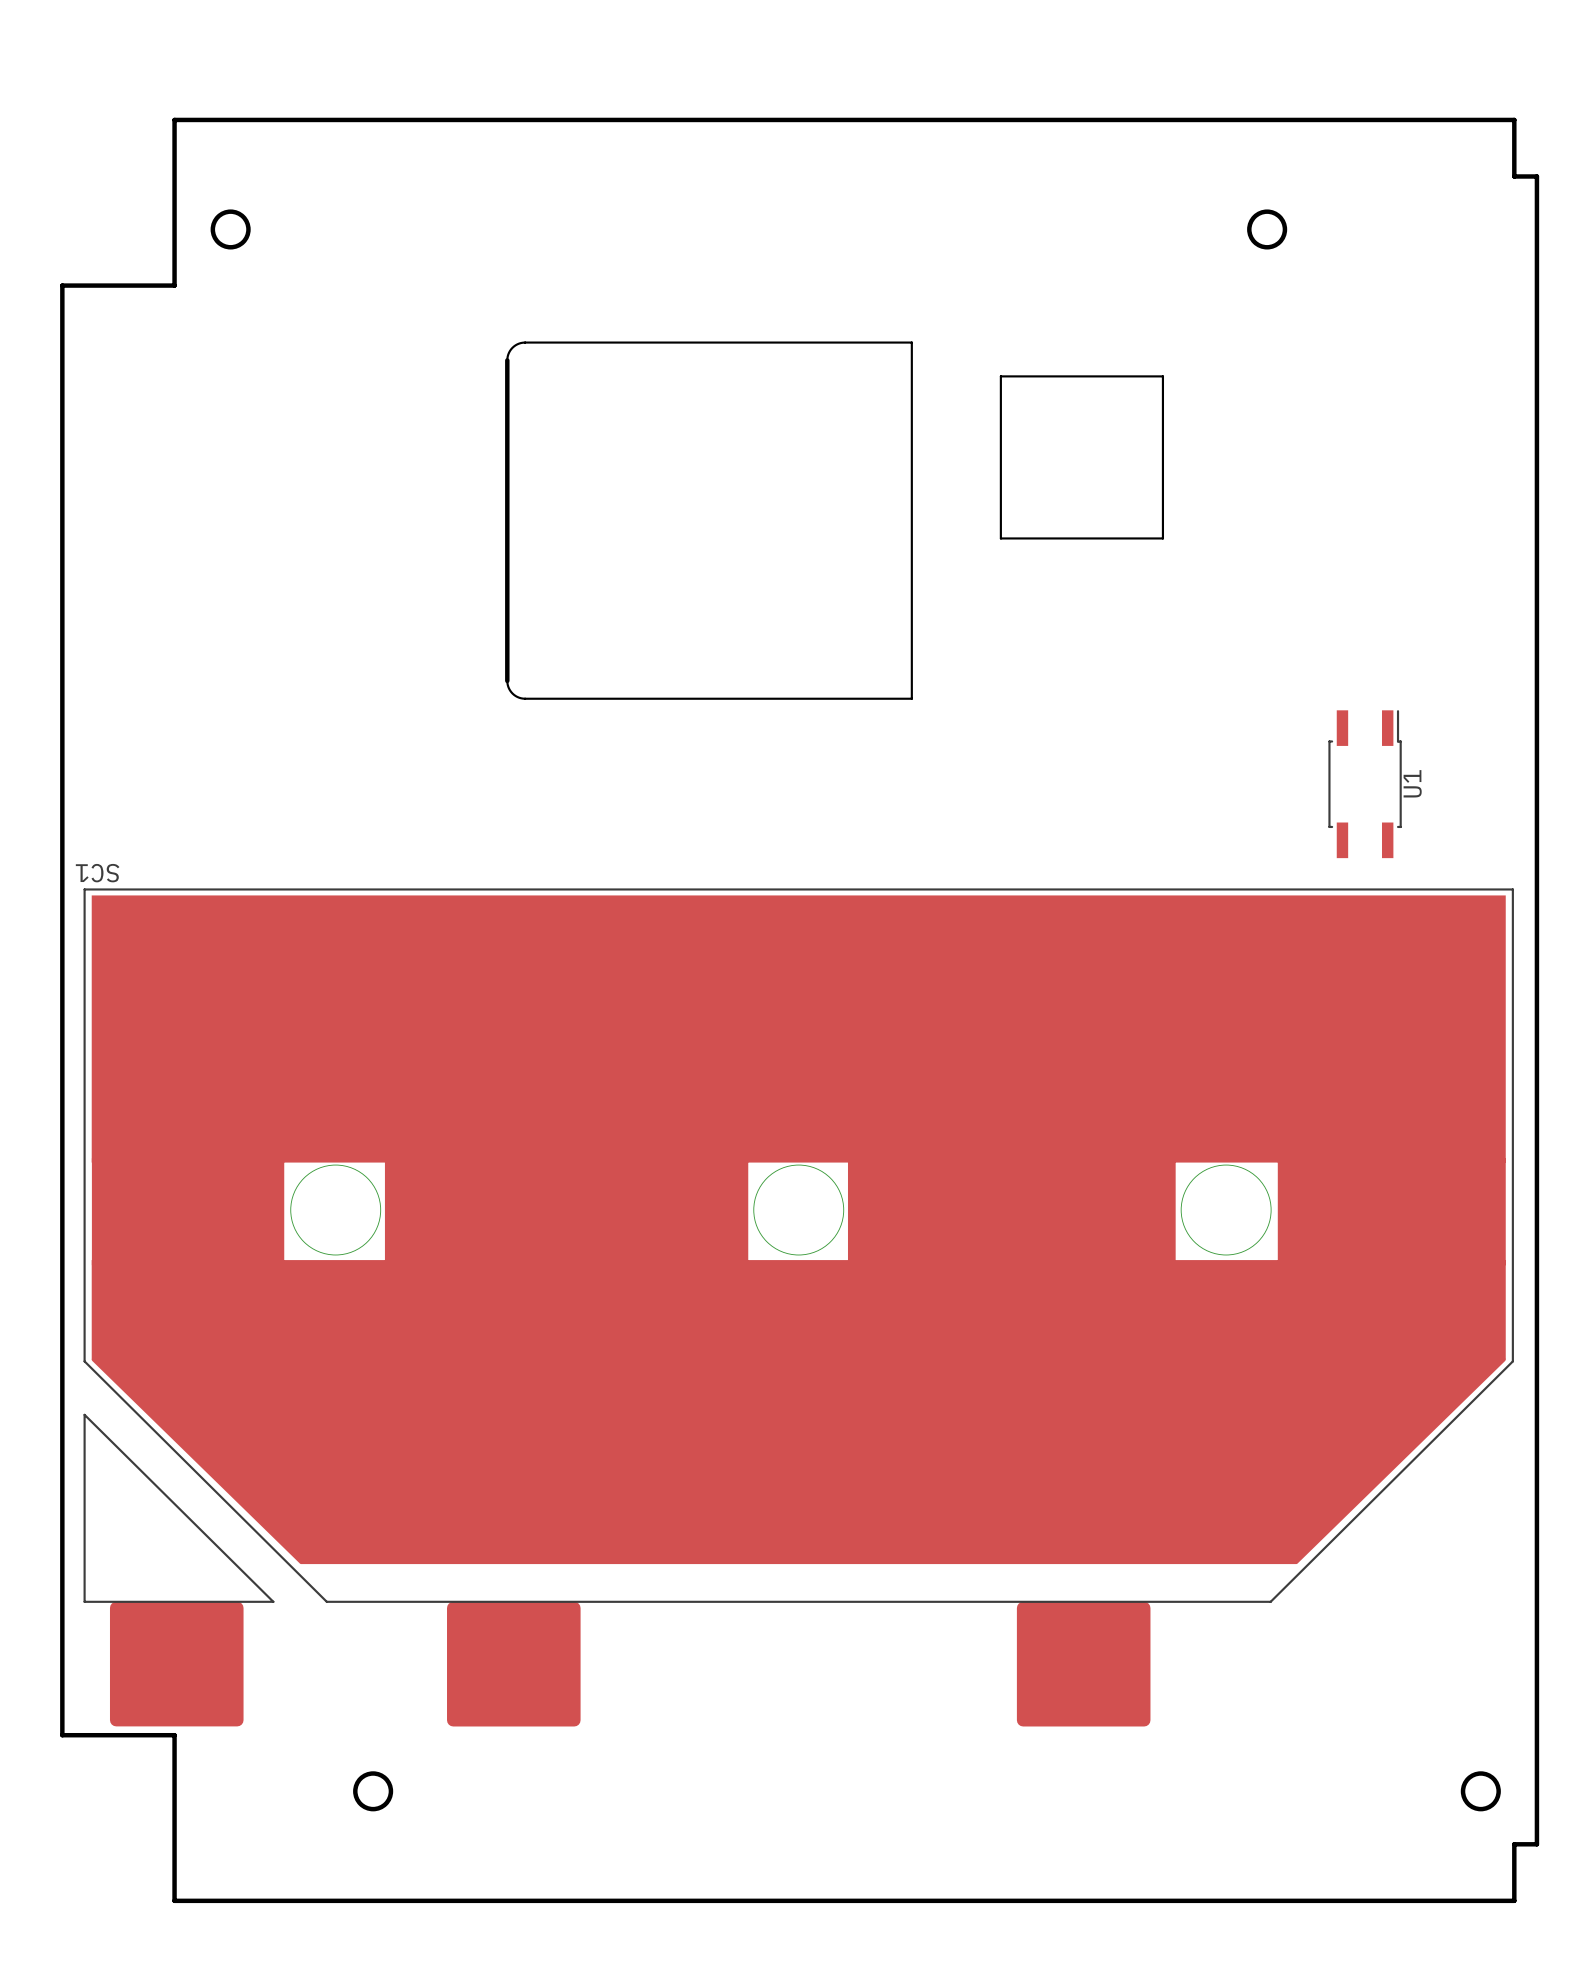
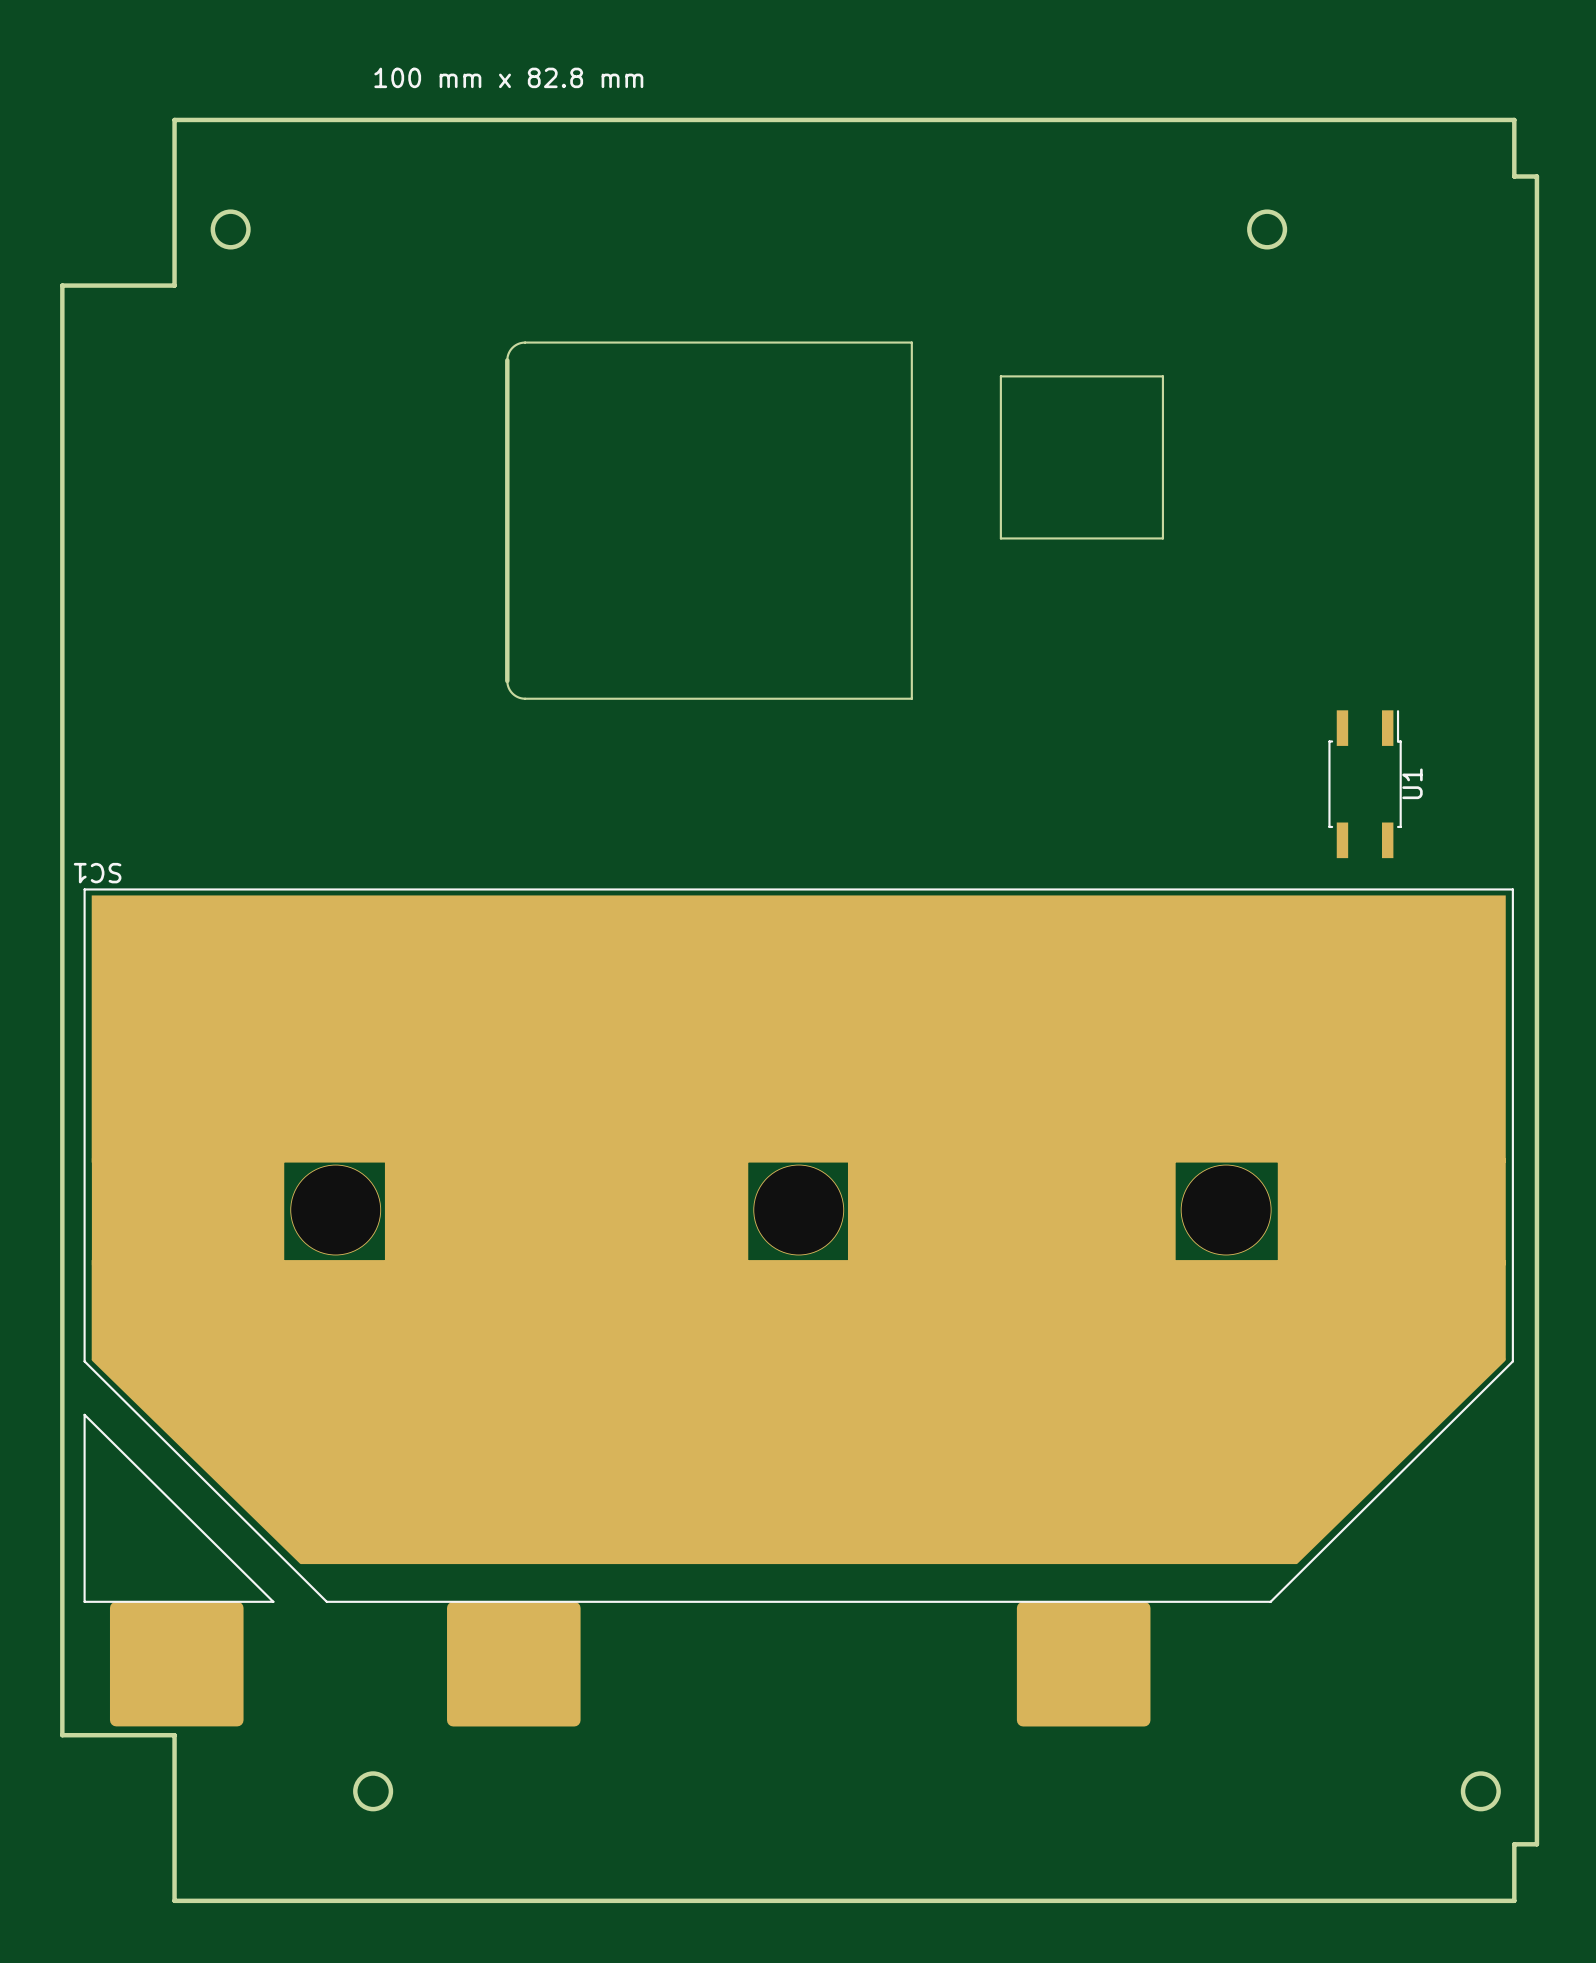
text: none -> 100 mm x 82.8 mm (508, 77)

